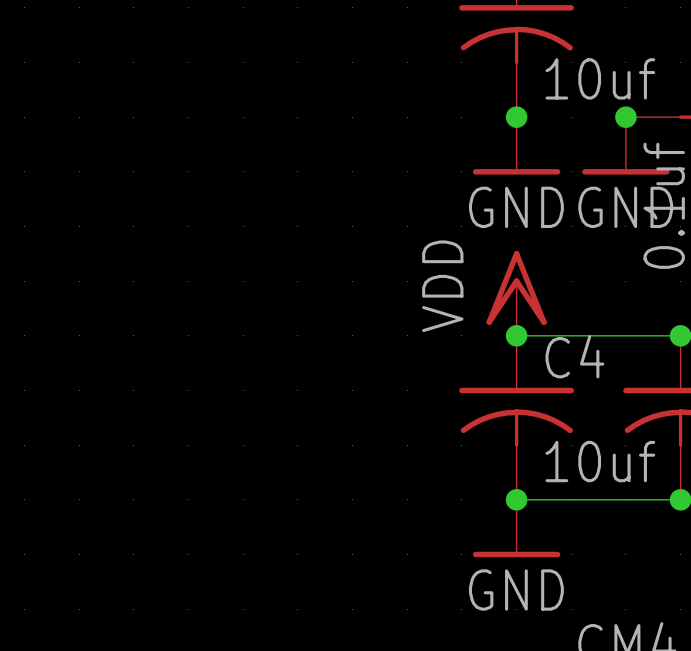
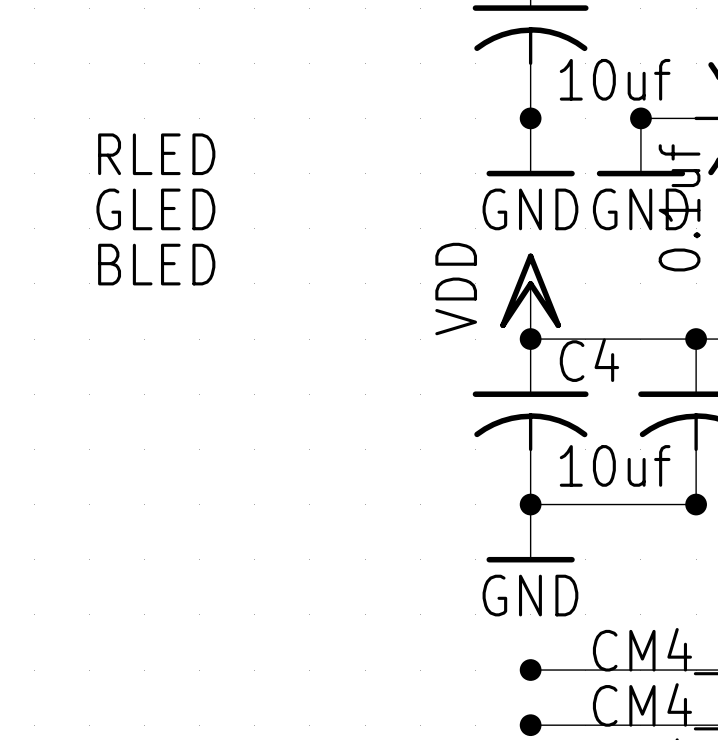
label: none -> RLED (156, 154)
label: none -> GLED (155, 209)
label: none -> BLED (156, 264)

